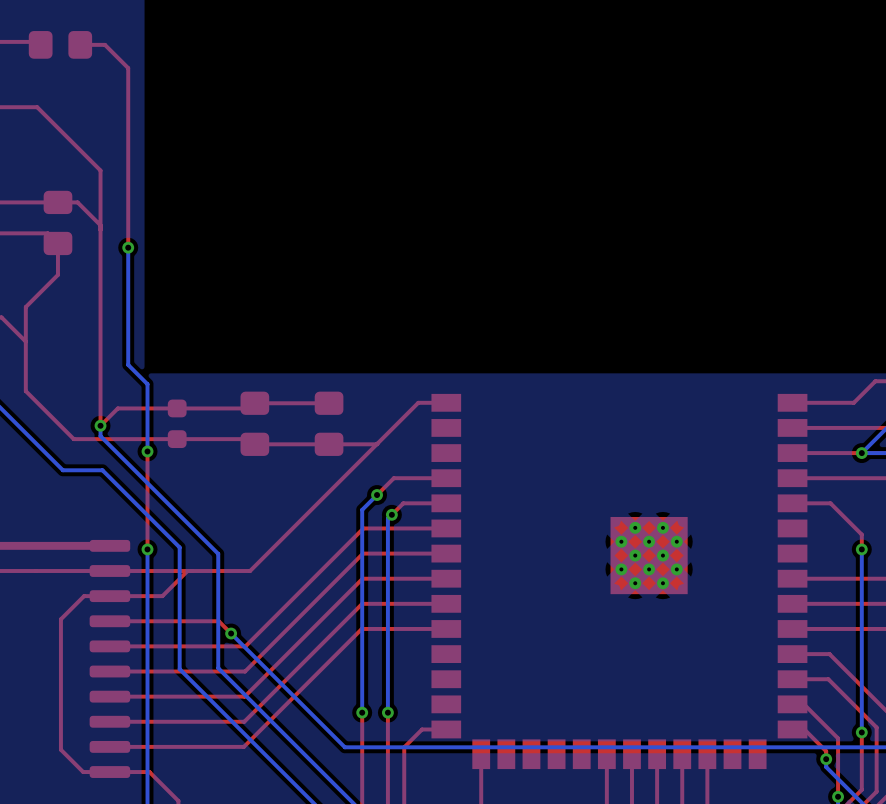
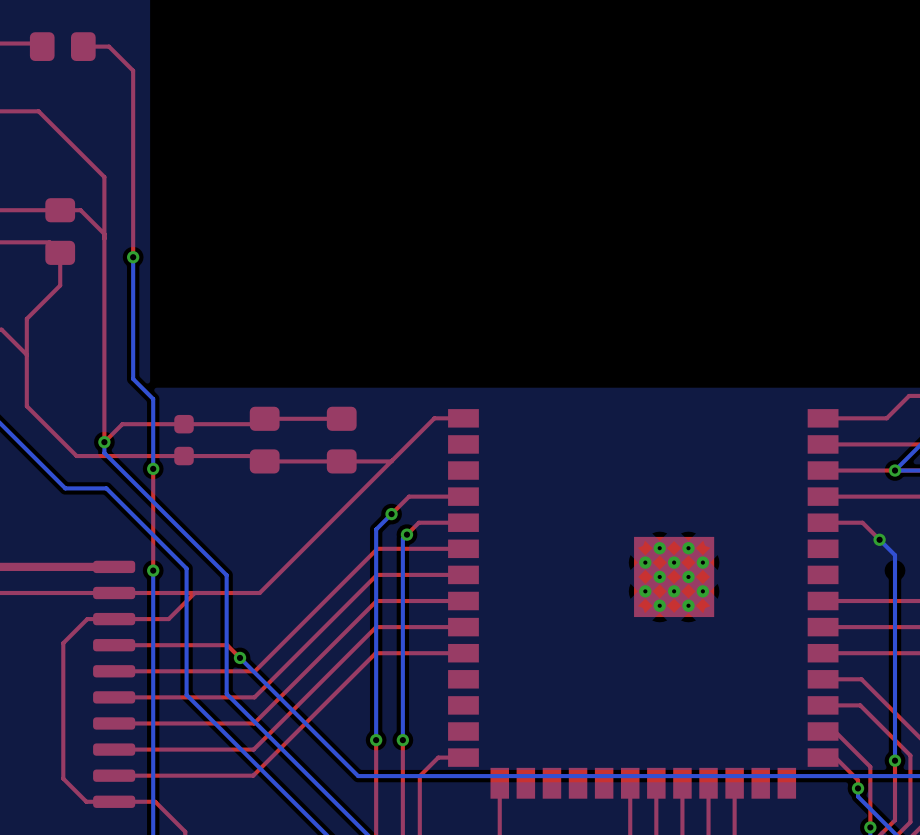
top track: (846, 519) (861, 534) (861, 549) -> none
bottom track: none -> (879, 539) (895, 555) (895, 570)
via position: (861, 549) -> (879, 539)

